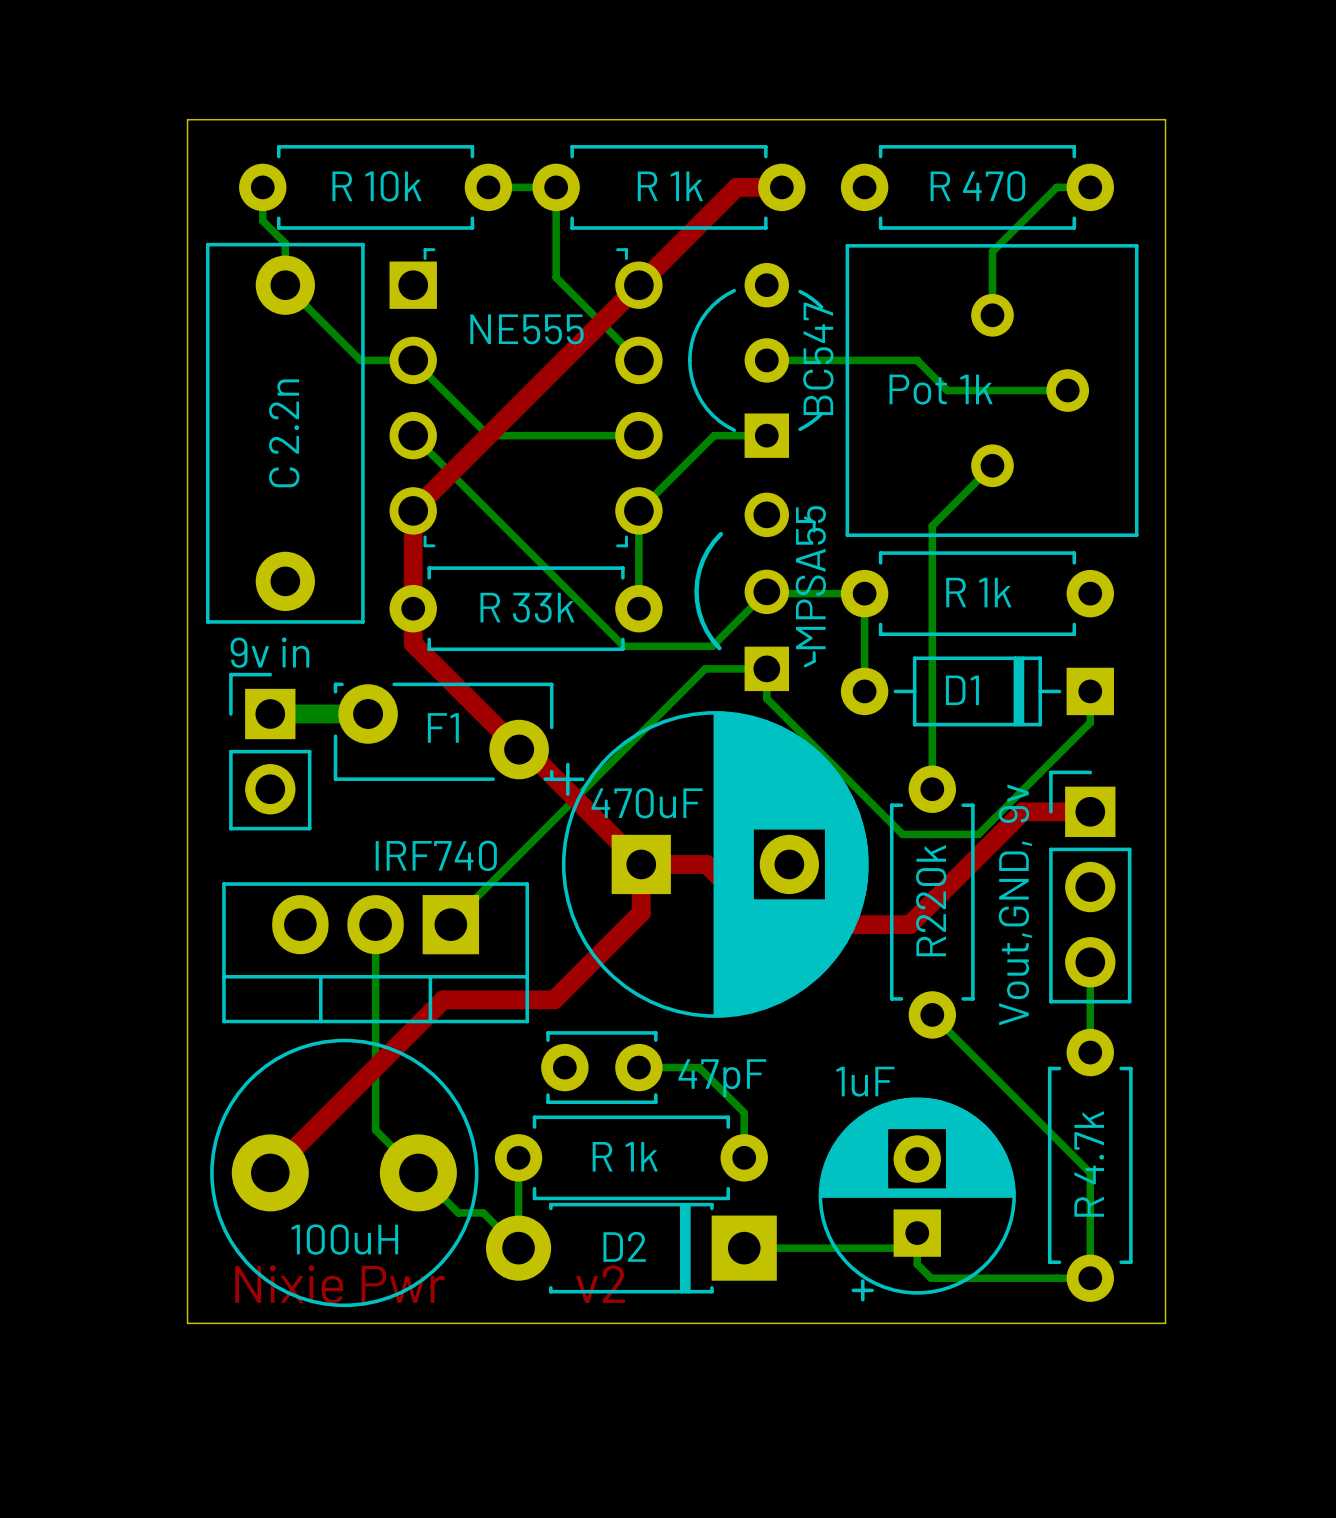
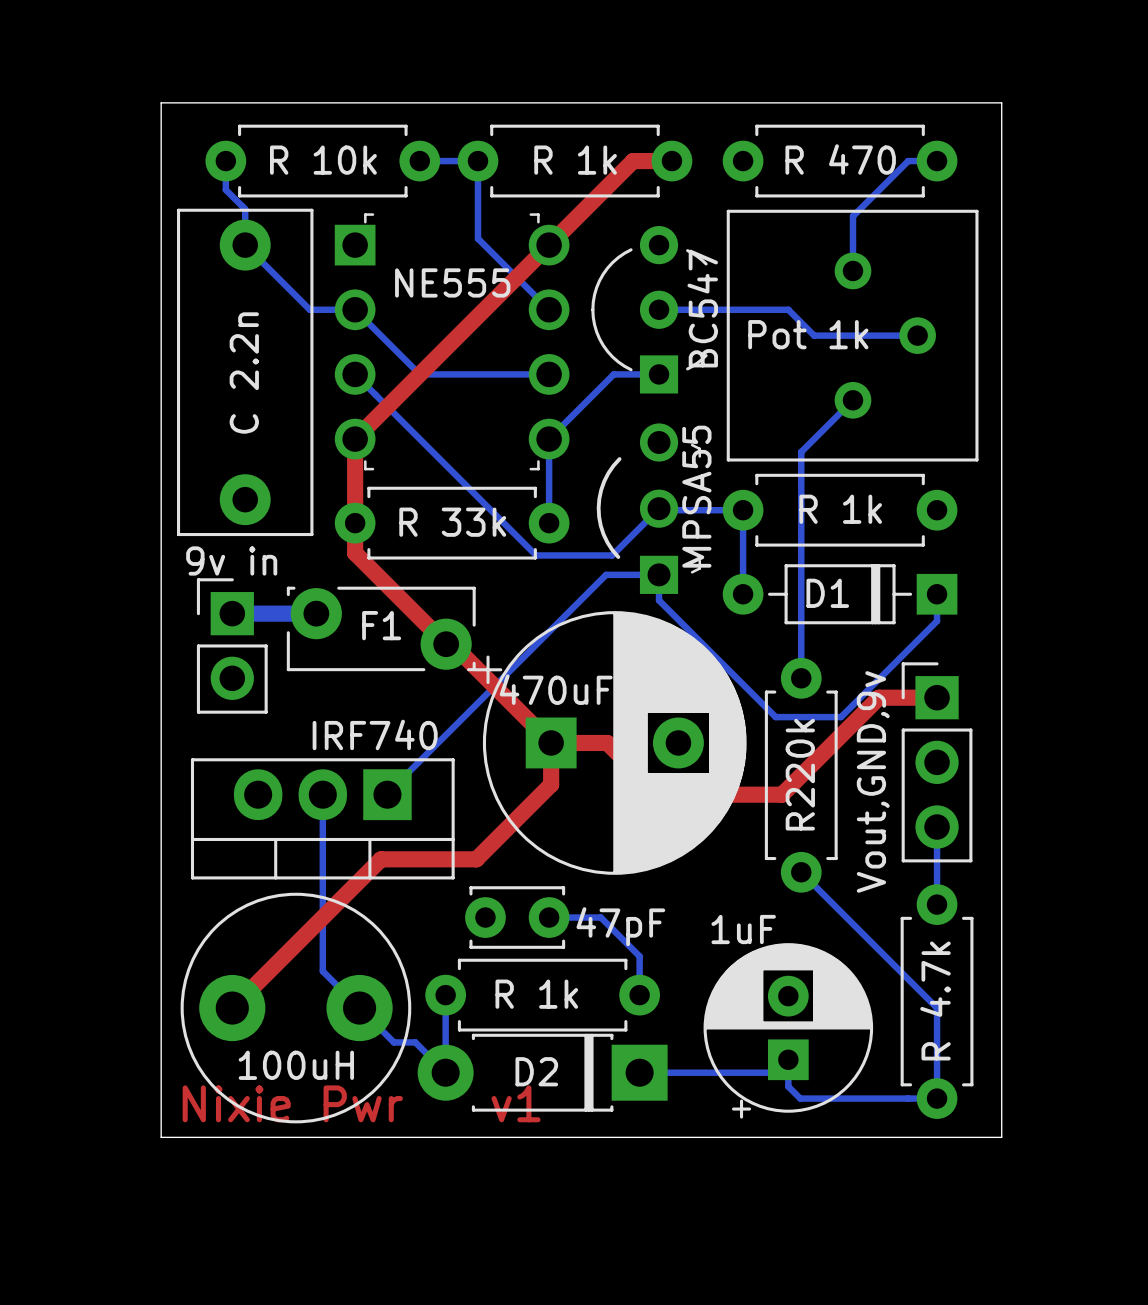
text: v2 (600, 1284) -> v1 (516, 1103)

